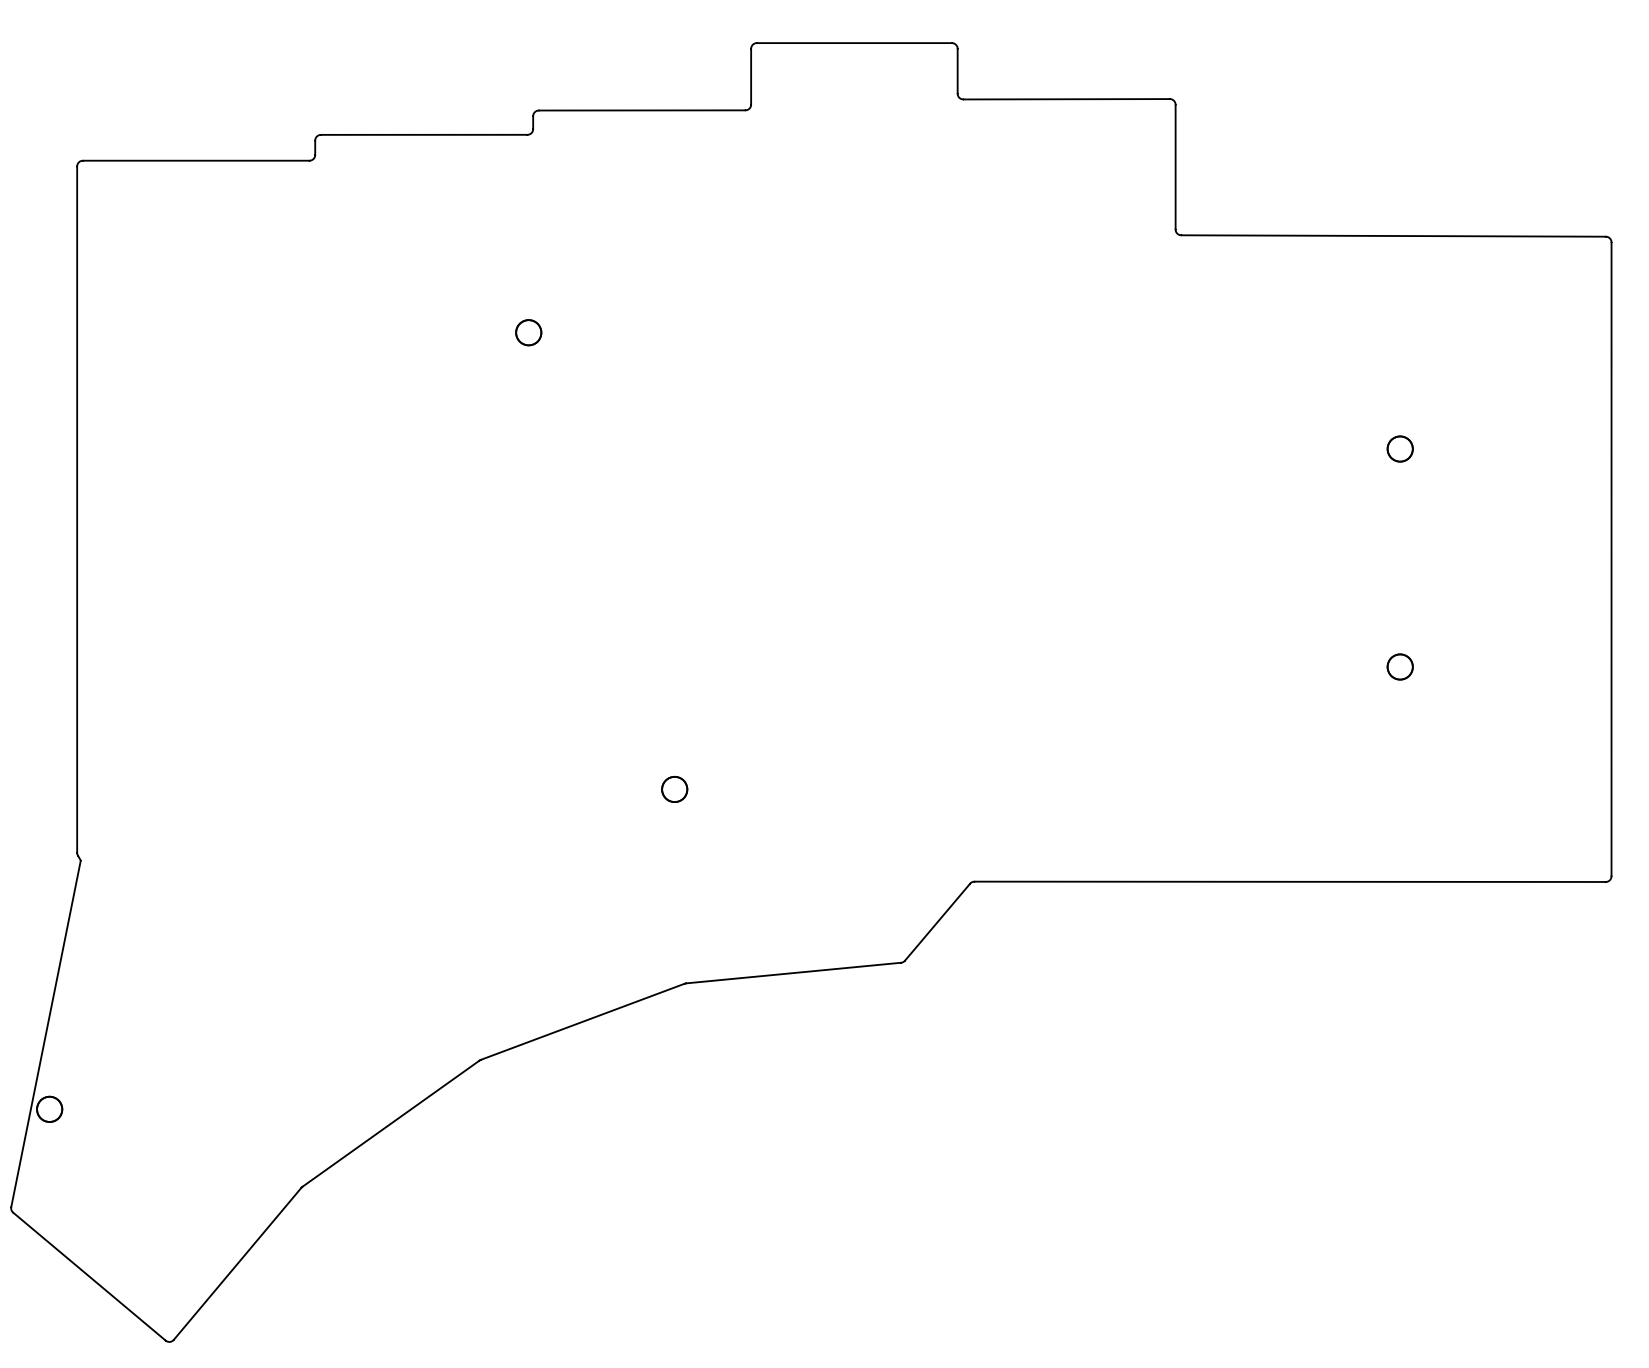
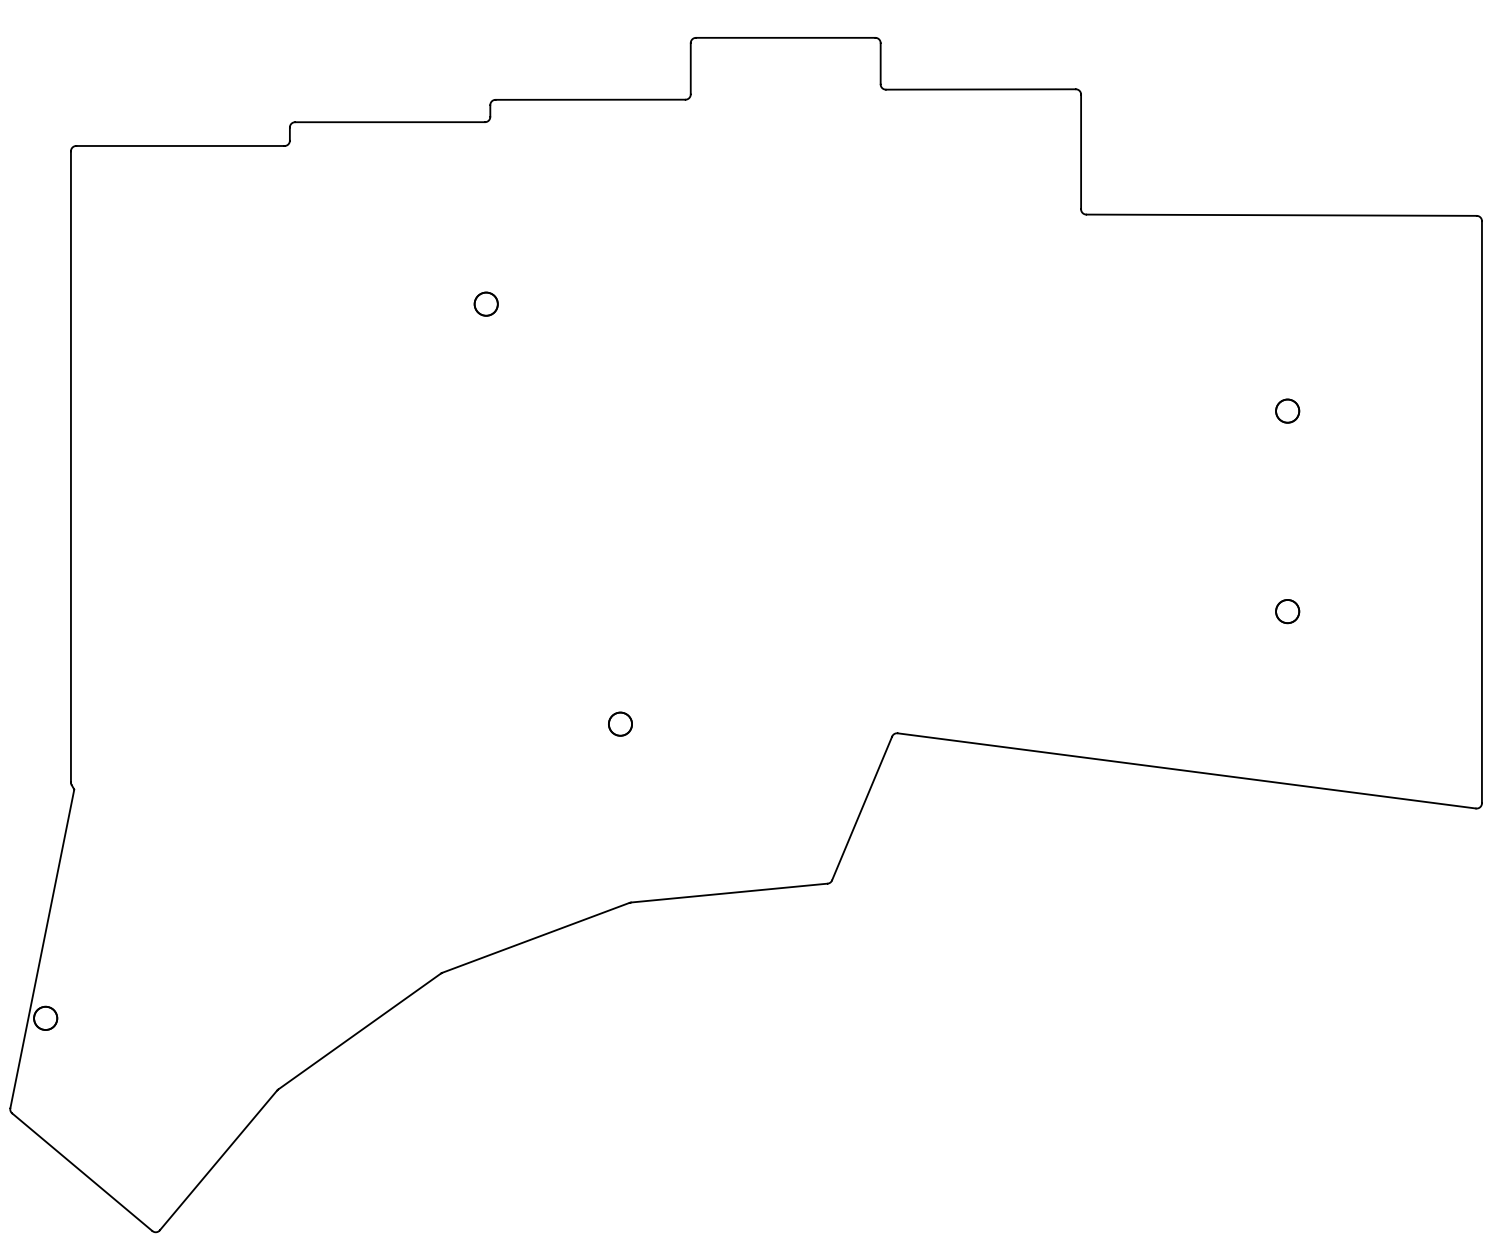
board edge: (1611, 875) (1610, 879) (1605, 881) (973, 881) (970, 883) (904, 960) (900, 962) -> (1481, 803) (1480, 807) (1476, 808) (896, 733) (892, 736) (832, 880) (827, 883)

